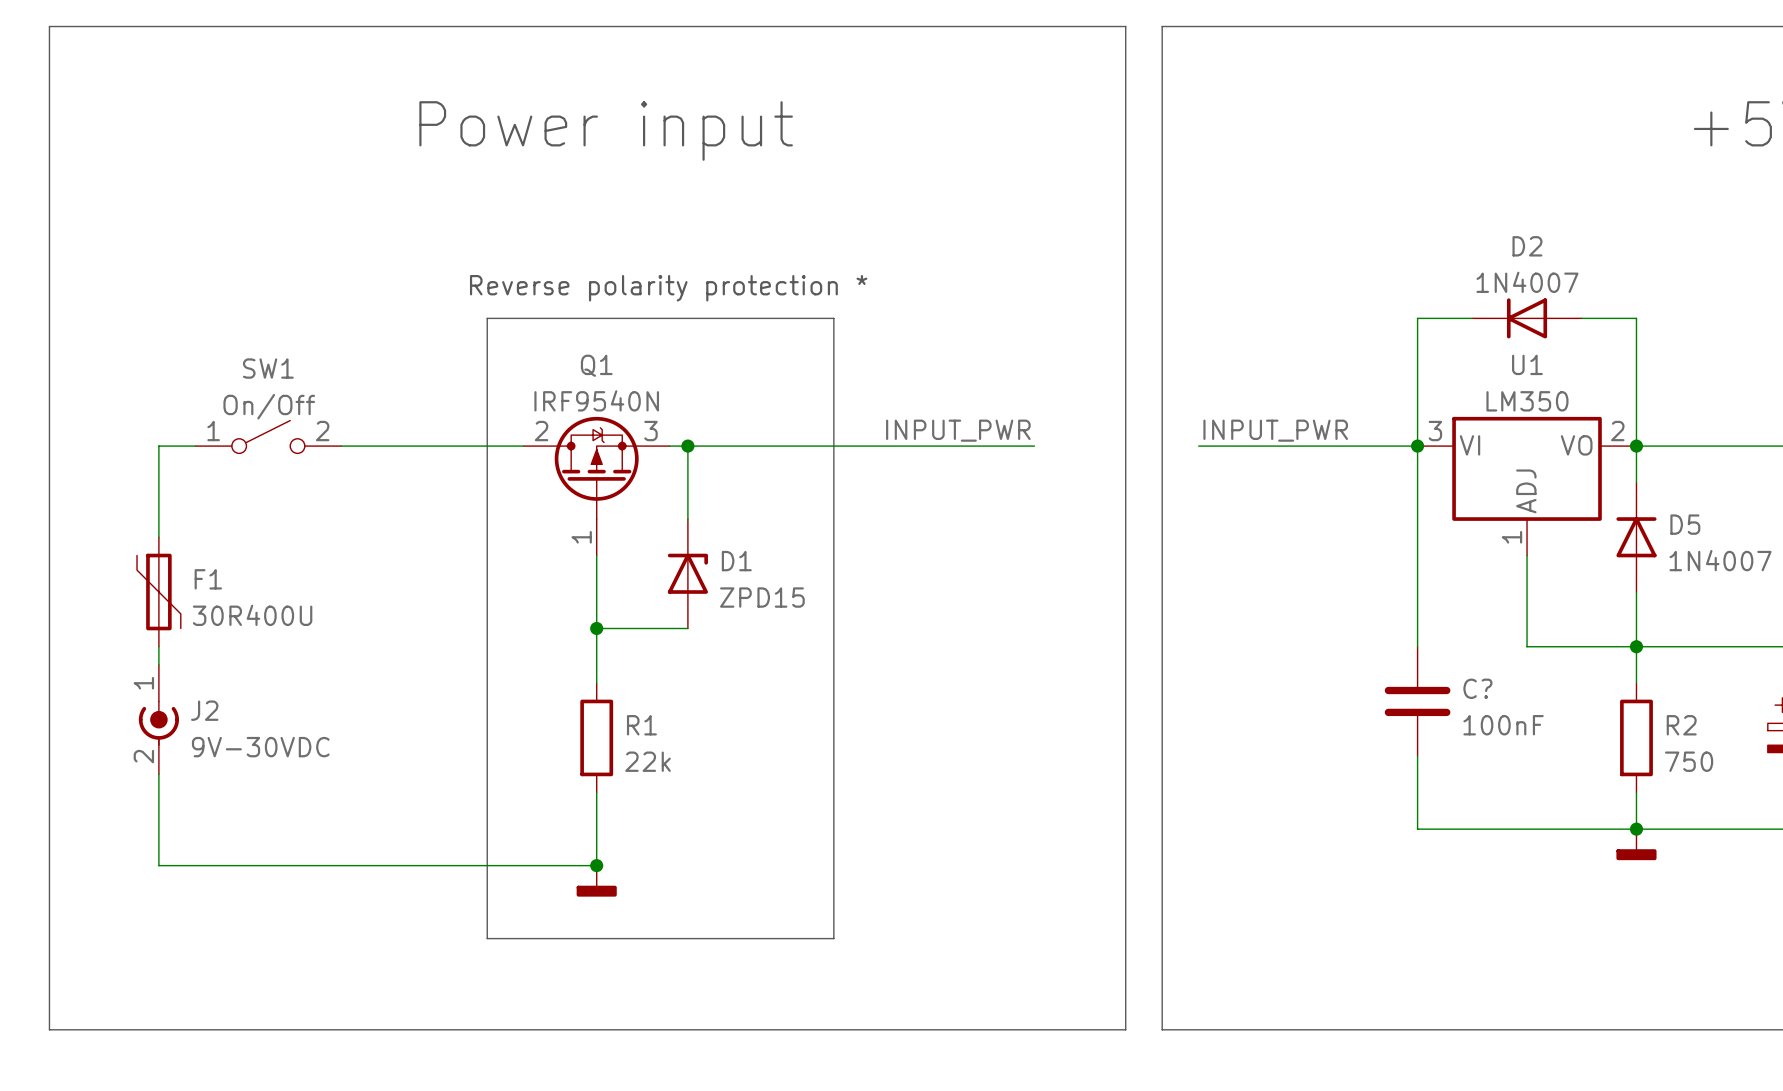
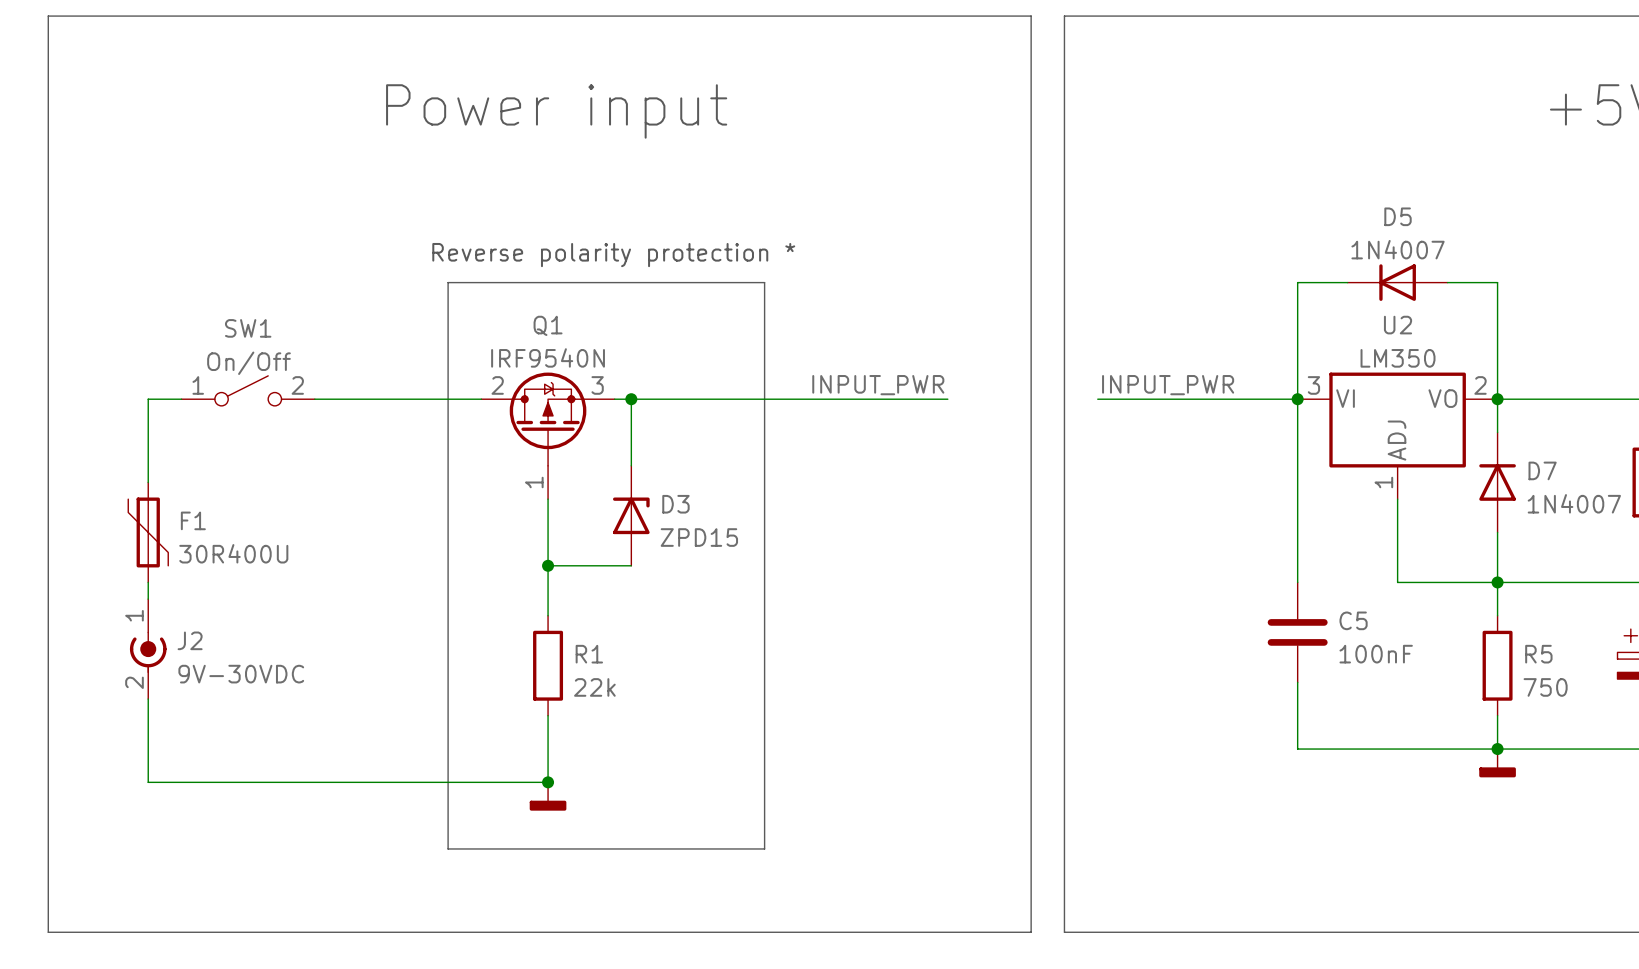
D2 name: D2 (1527, 246) -> D5 (1398, 216)
U1 name: U1 (1527, 364) -> U2 (1398, 325)
D5 name: D5 (1685, 524) -> D7 (1542, 470)
D1 name: D1 (736, 561) -> D3 (675, 504)
C? name: C? (1477, 688) -> C5 (1353, 620)
R2 name: R2 (1681, 725) -> R5 (1538, 654)

